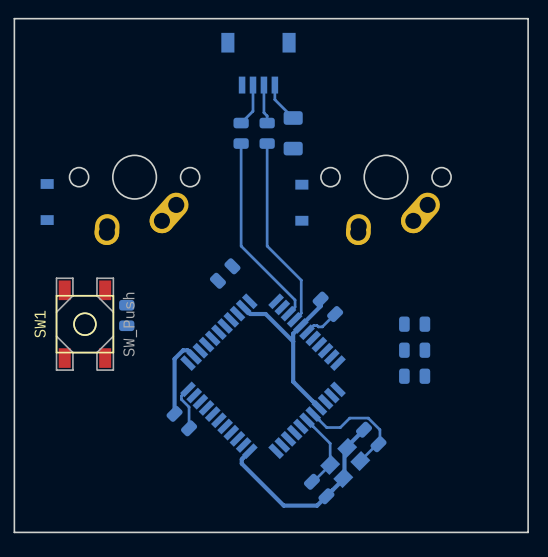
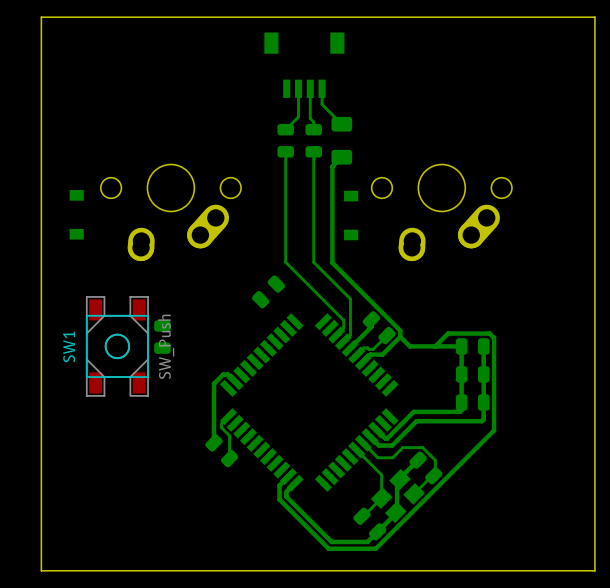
bottom track: none -> (341, 157) (332, 166) (332, 262) (400, 330) (400, 336)
bottom track: (243, 307) (250, 314) (265, 314) (293, 341) -> none
bottom track: none -> (400, 336) (409, 346) (461, 346) (461, 410) (459, 411) (413, 411) (386, 438) (376, 430)
bottom track: none -> (400, 336) (382, 354) (370, 354) (363, 361)
bottom track: none -> (435, 346) (448, 333) (489, 333) (494, 337) (494, 430) (375, 548) (328, 548) (279, 499) (279, 485) (288, 476)
bottom track: (300, 325) (293, 333) (293, 381) (319, 407) -> (483, 346) (483, 419) (482, 421) (416, 421) (392, 445) (378, 445) (370, 436)

